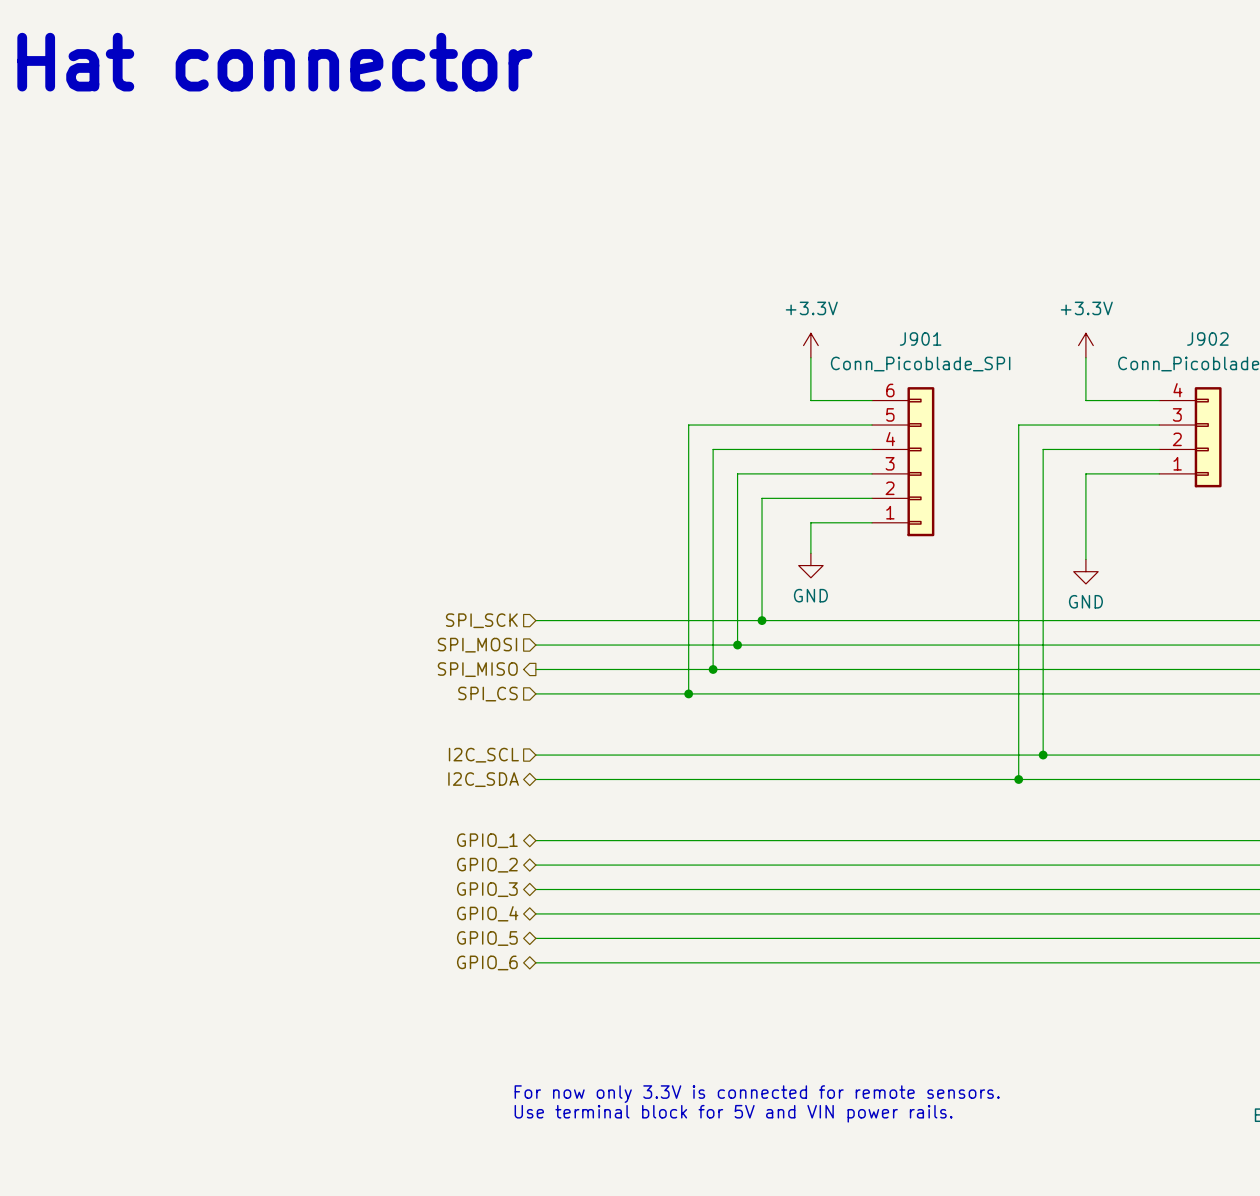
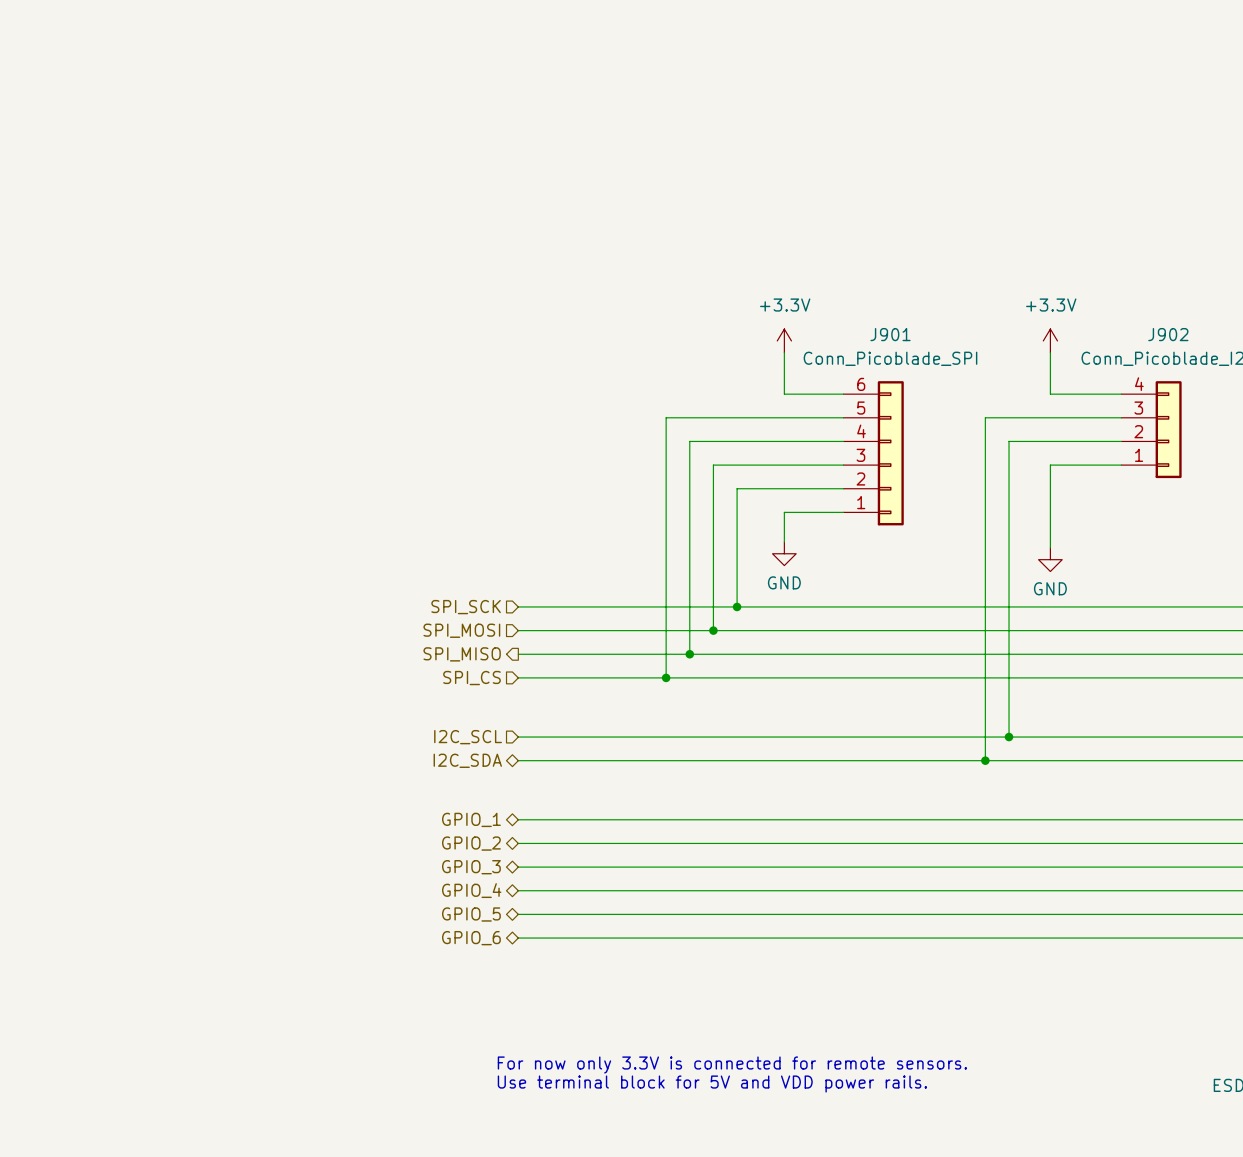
text: Hat connector (274, 62) -> none
text: Use terminal block for 5V and VIN power rails. (733, 1113) -> Use terminal block for 5V and VDD power rails. (712, 1084)

